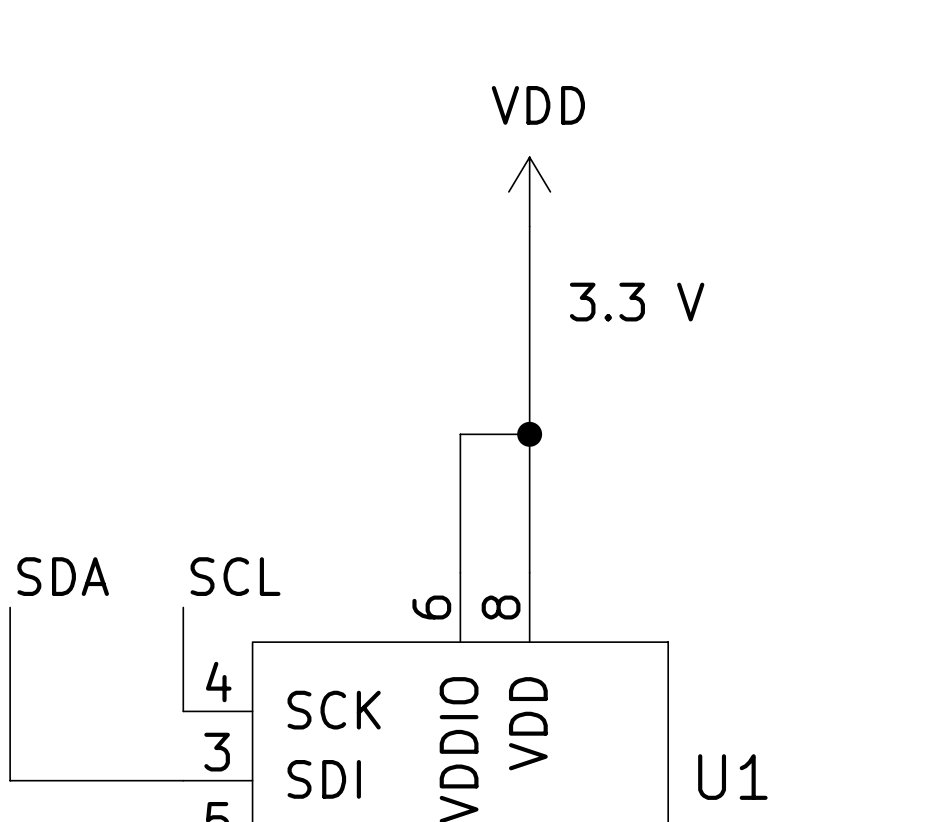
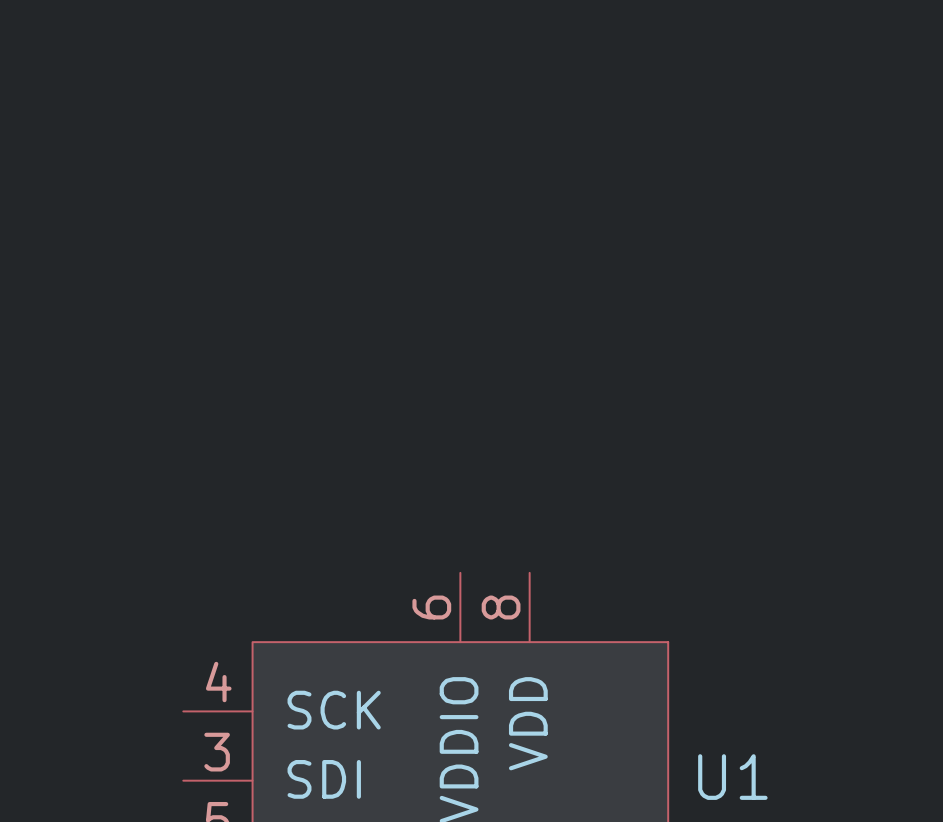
power symbol: VDD (529, 191) -> none
wire: (529, 226) (529, 572) -> none
text: 3.3 V (637, 302) -> none
wire: (529, 434) (460, 434) (460, 572) -> none
junction: (529, 434) -> none
label: SDA (63, 576) -> none
label: SCL (235, 576) -> none
wire: (10, 607) (10, 780) (183, 780) -> none
wire: (183, 607) (183, 711) -> none

